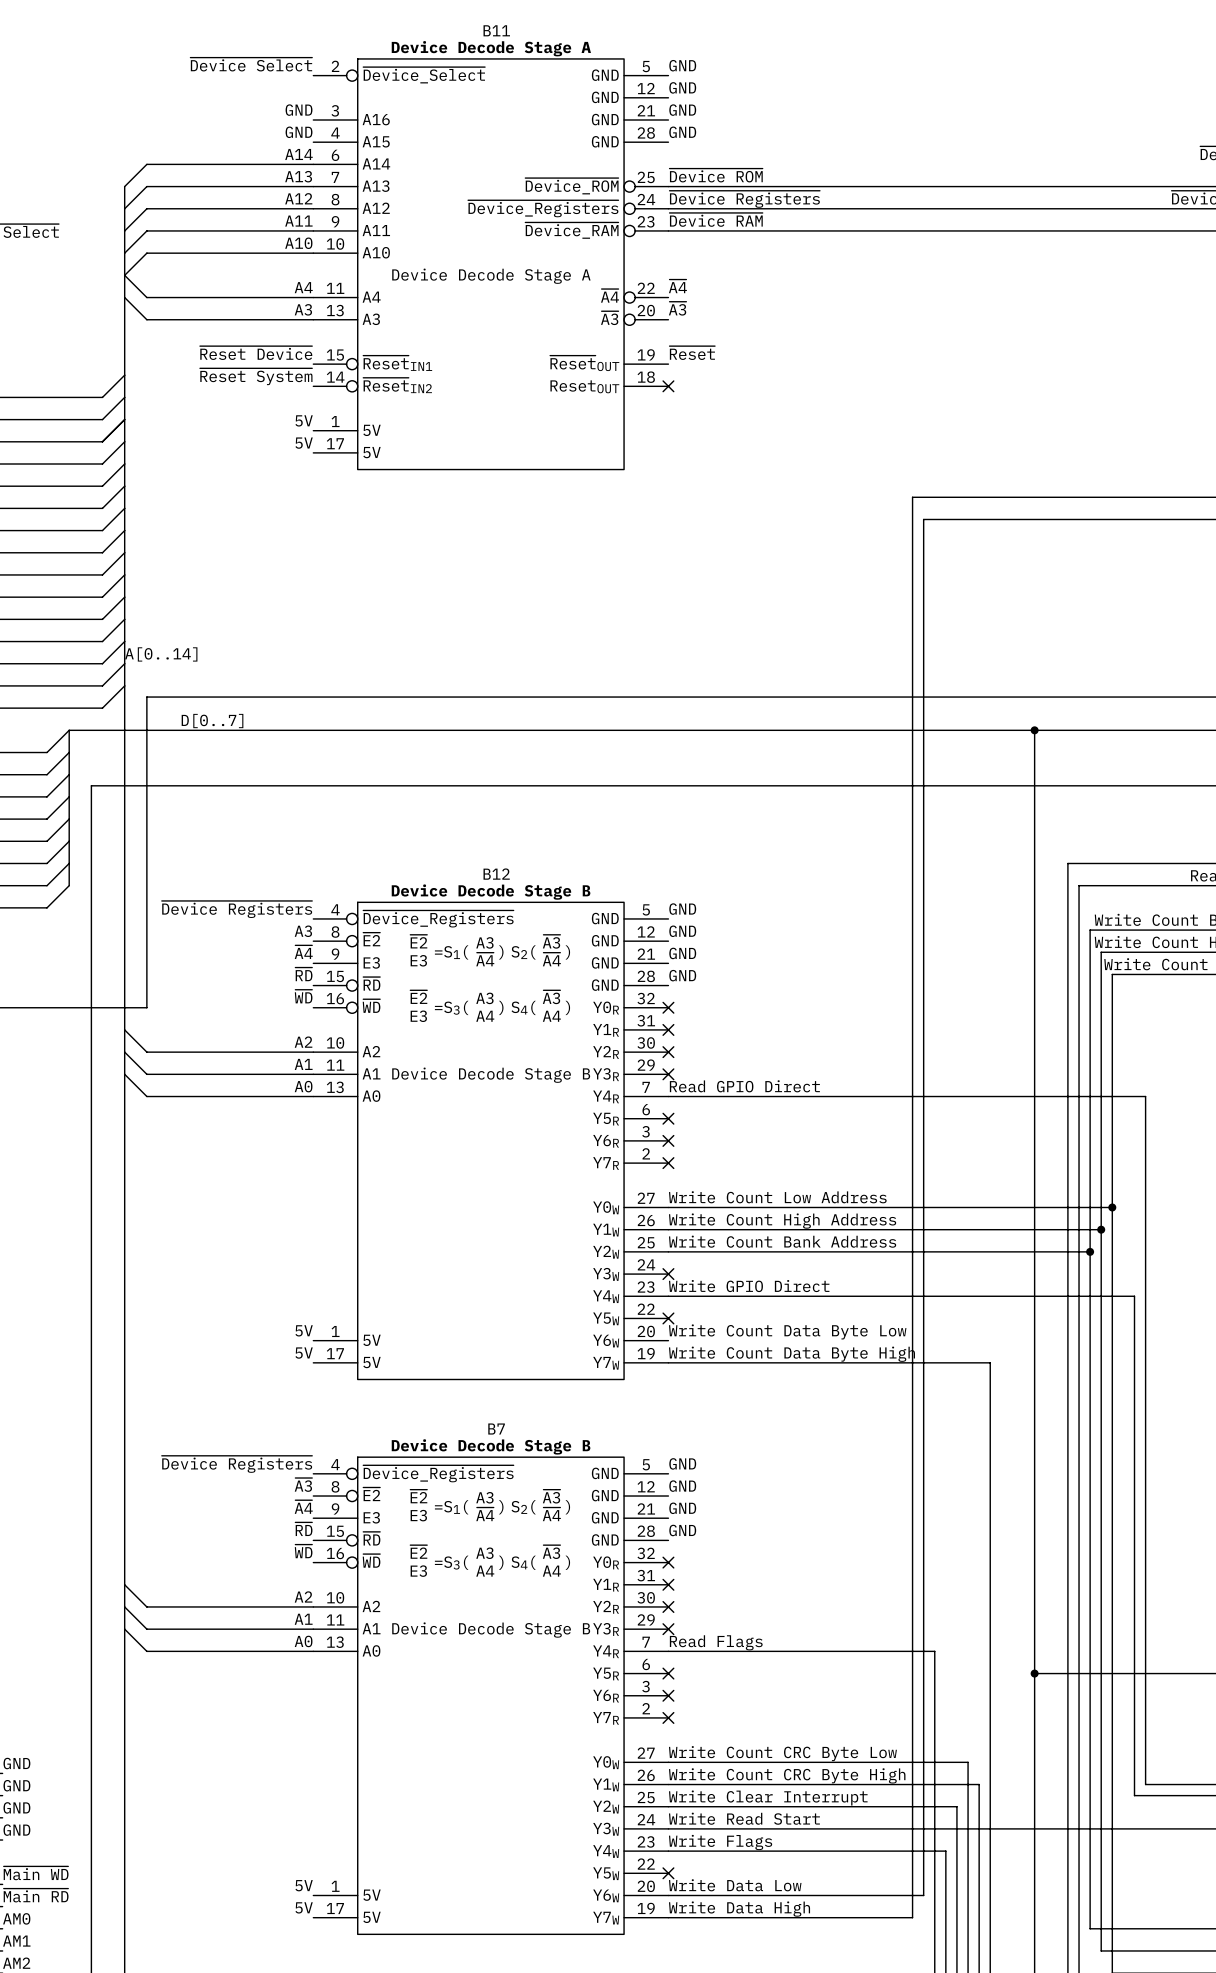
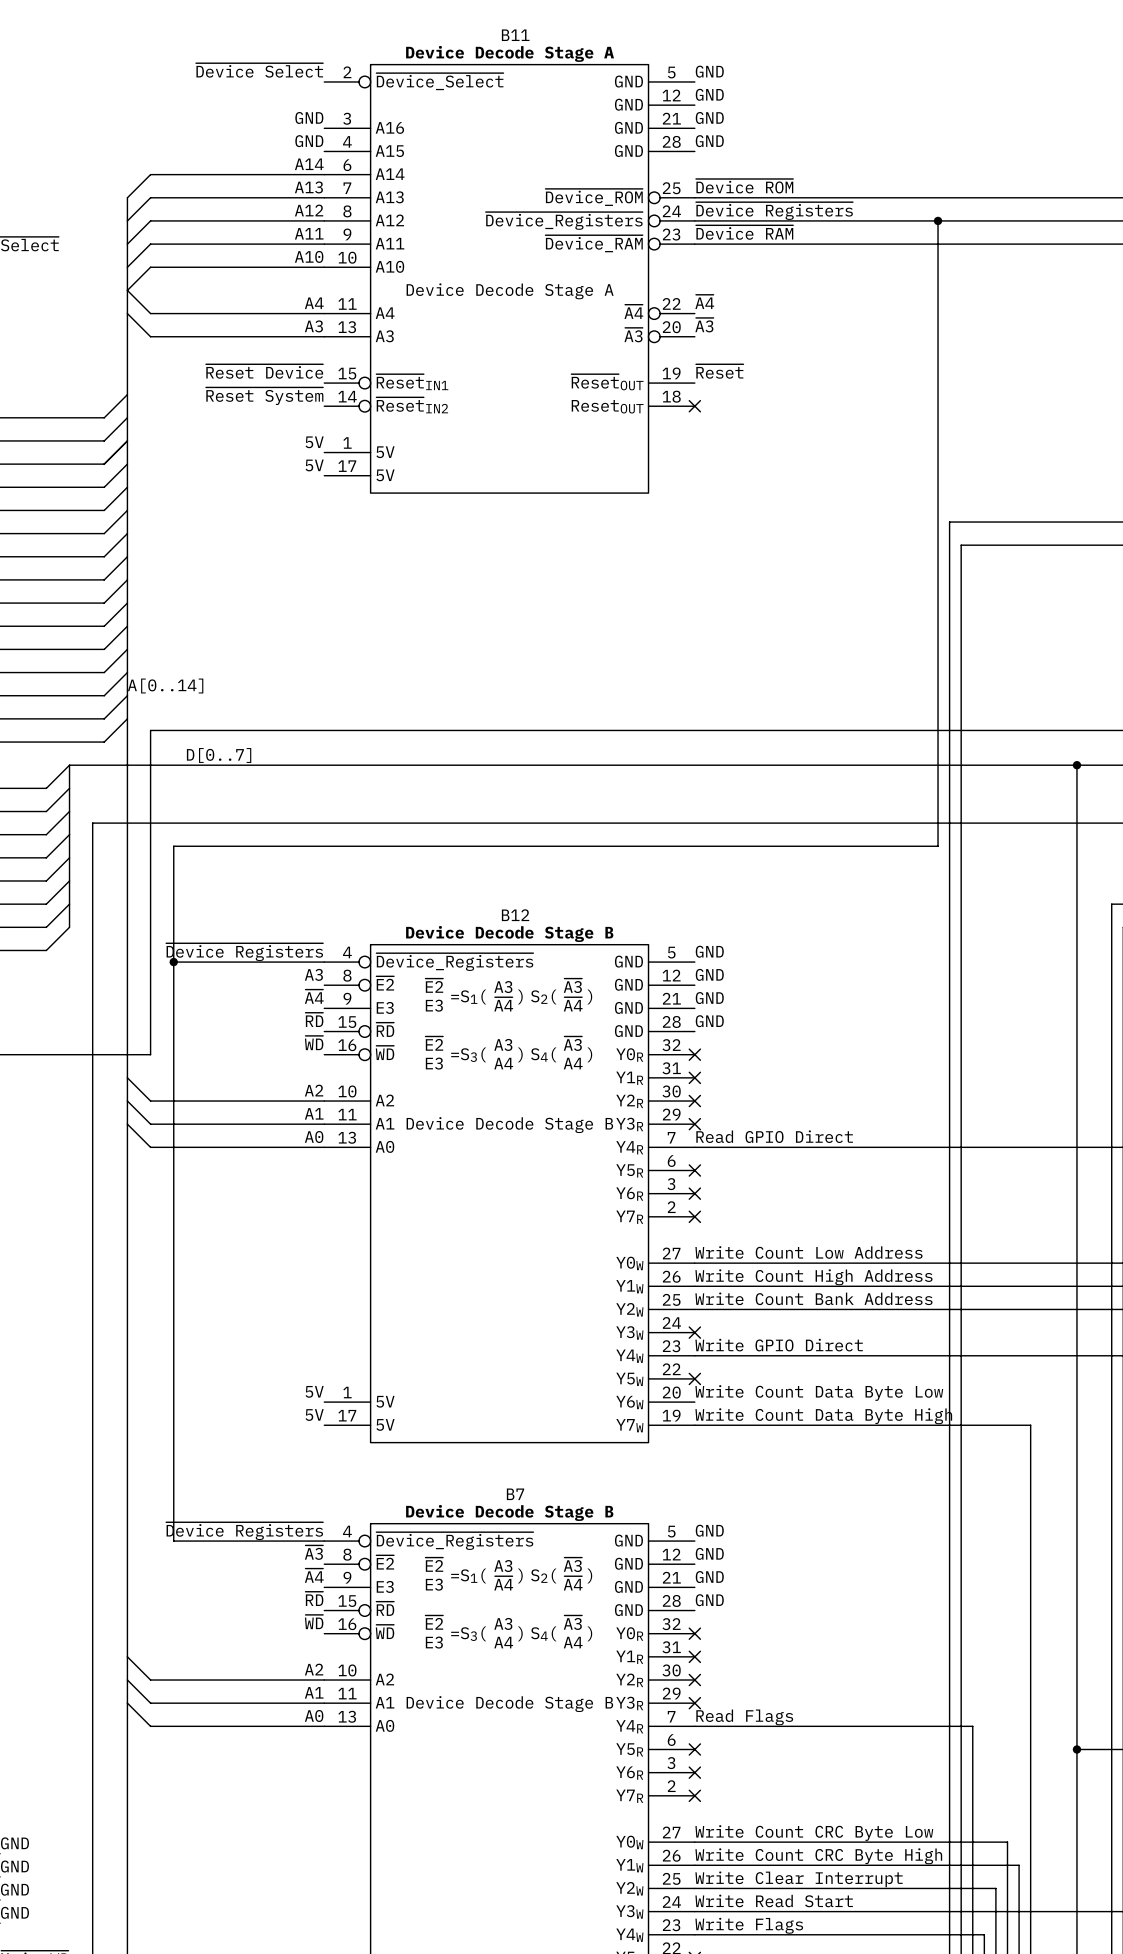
wire: none -> (938, 220) (938, 846) (173, 846) (173, 1541) (324, 1541)
junction: none -> (938, 220)
wire: none -> (173, 962) (324, 962)
junction: none -> (173, 962)

